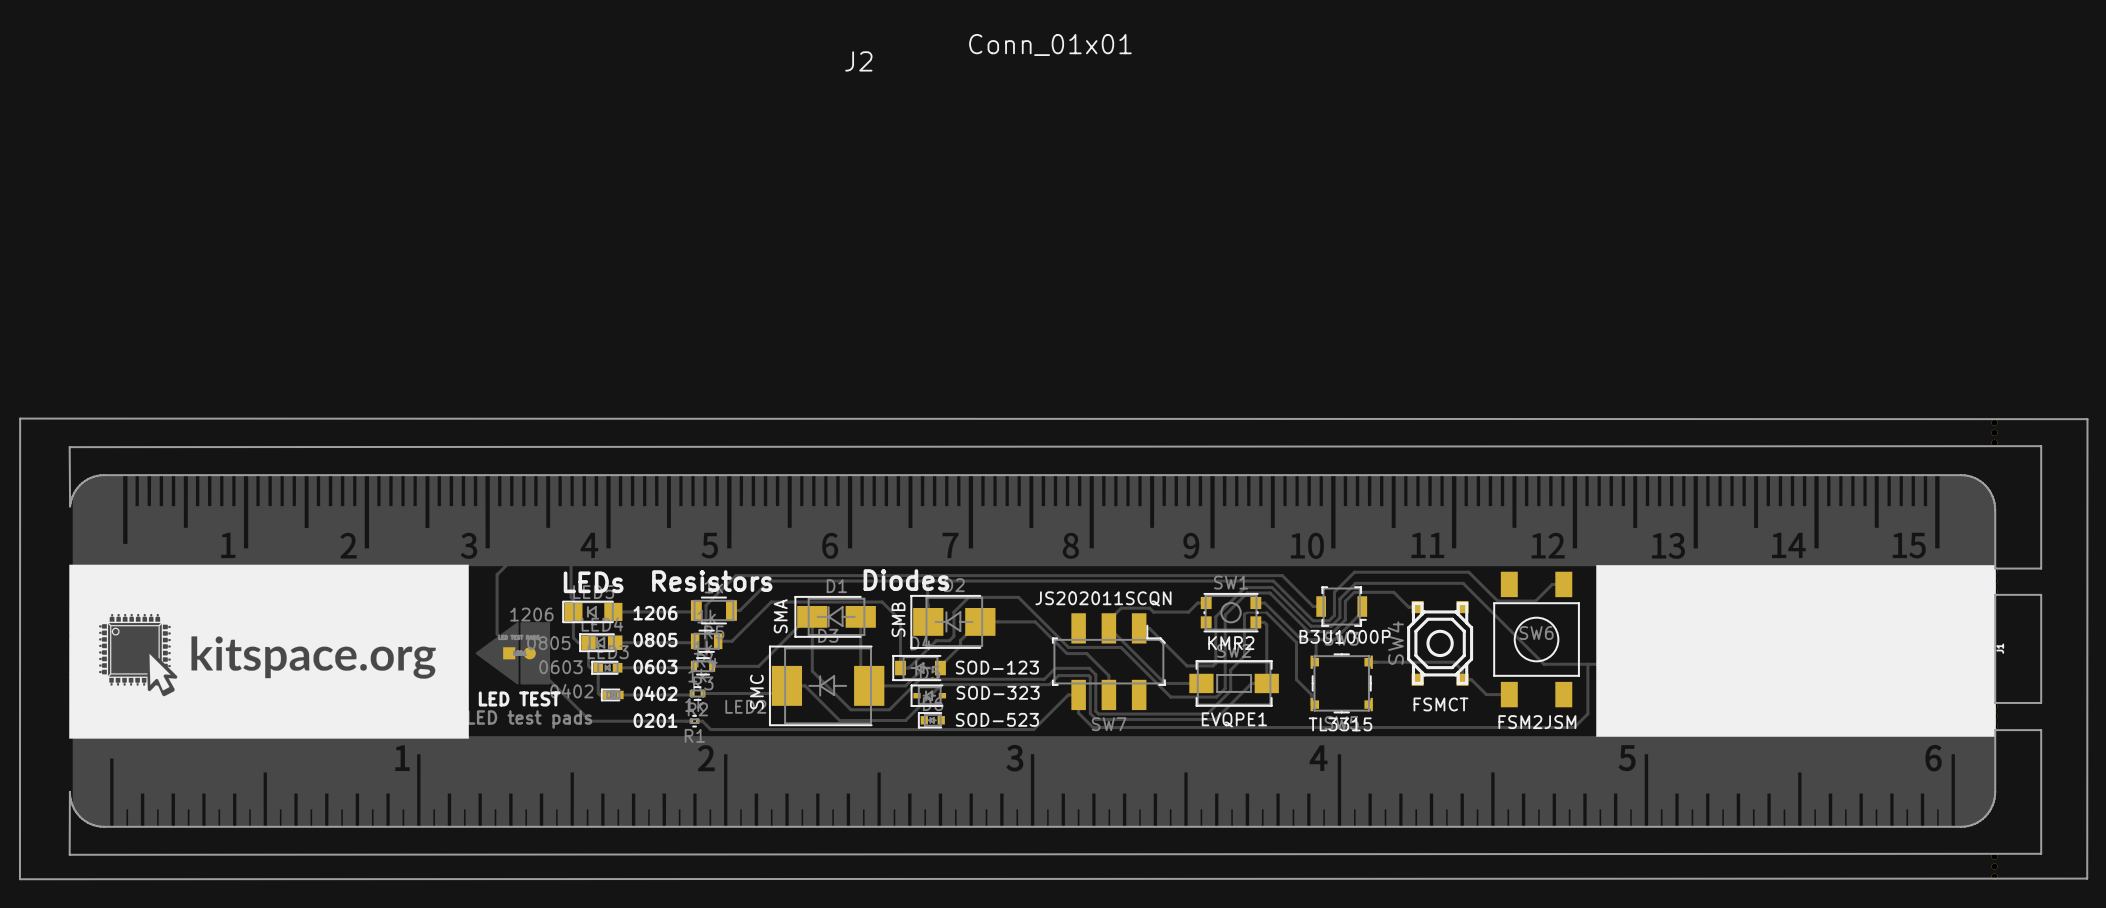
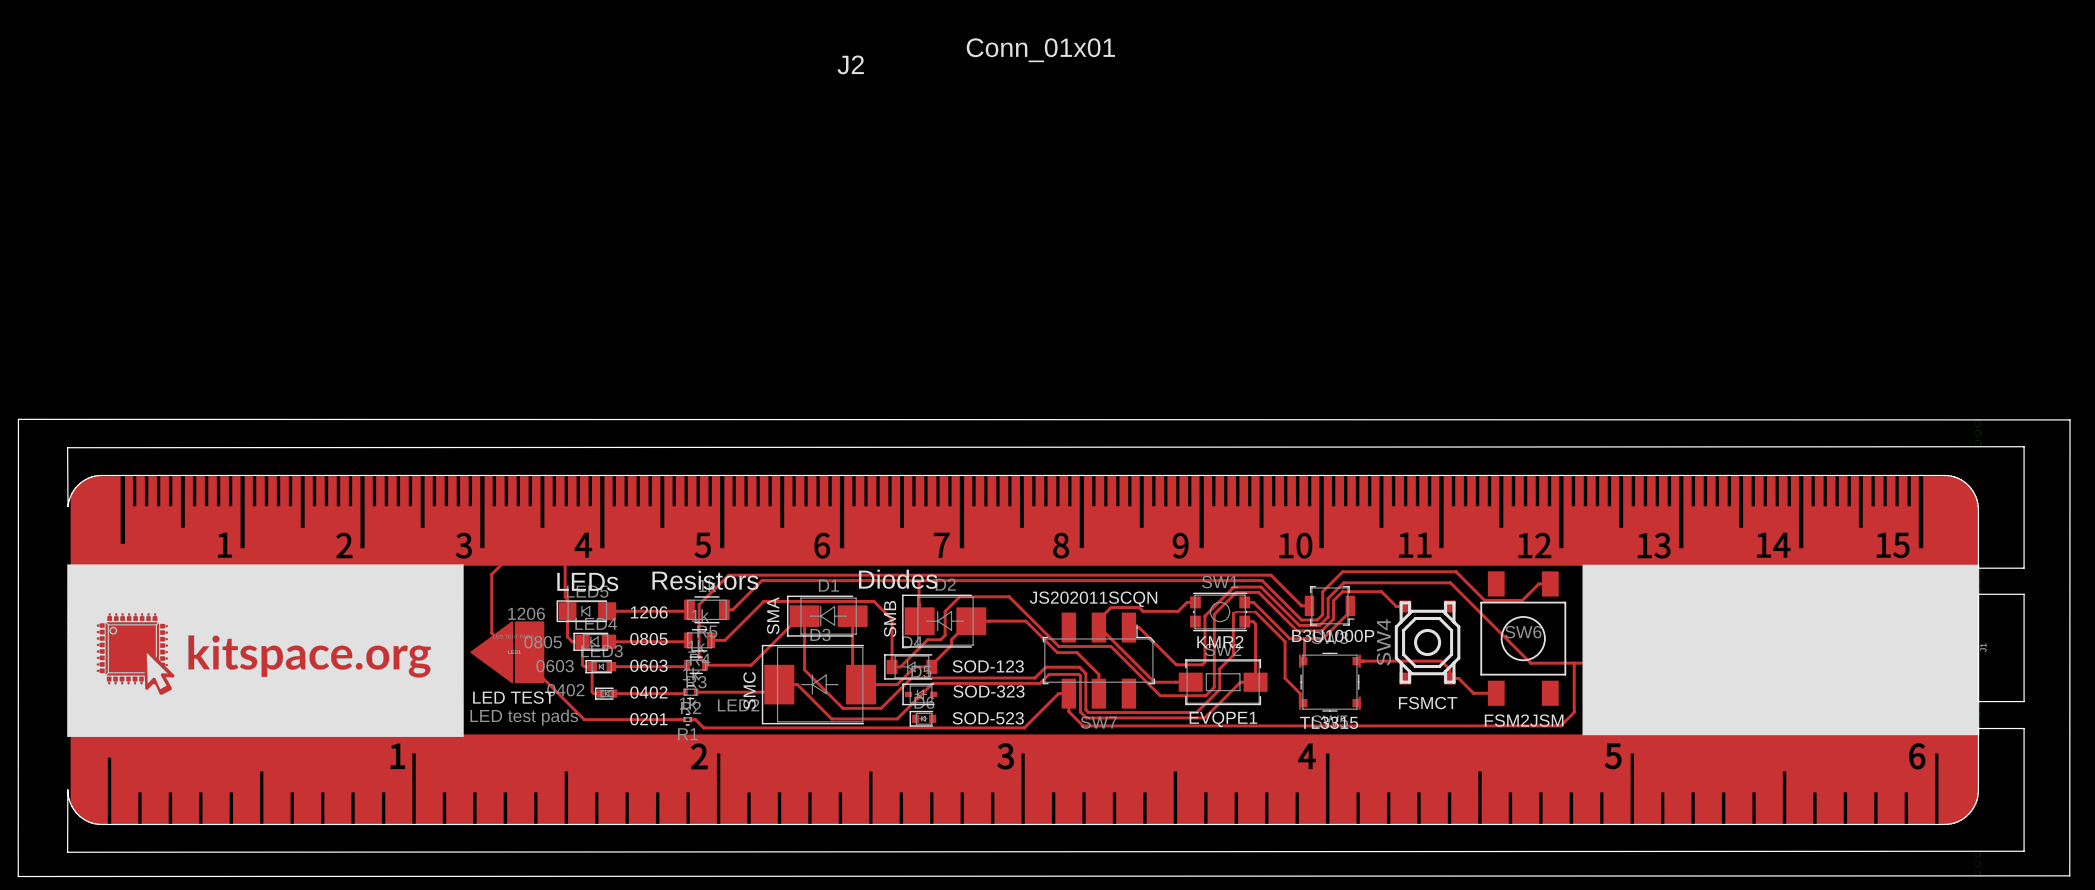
J2 footprint: [19, 417, 2089, 880] -> [17, 418, 2071, 878]

